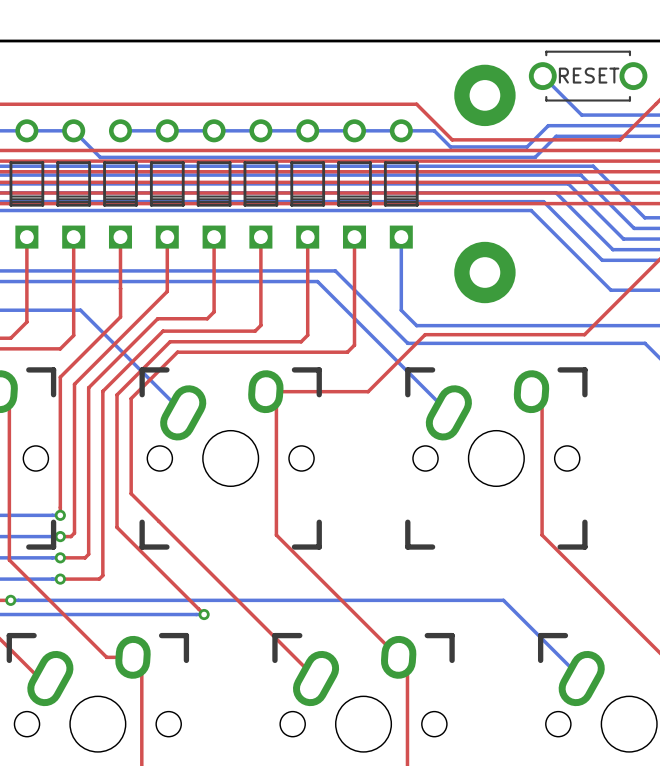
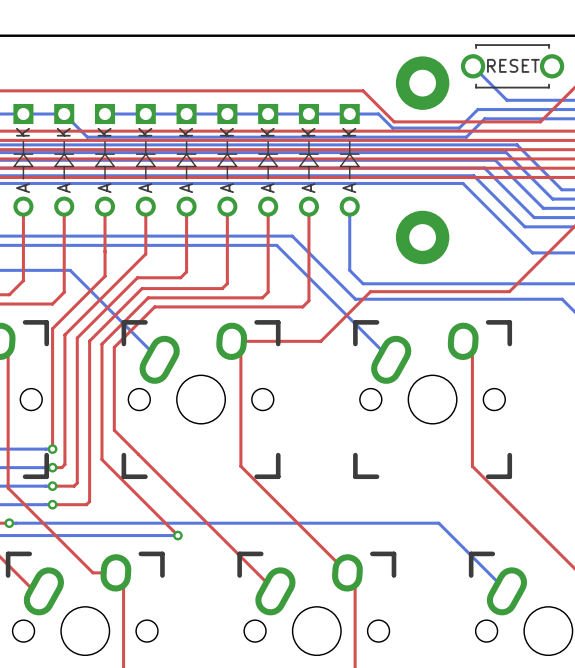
part footprint: [9, 119, 45, 249] -> [13, 103, 34, 217]
part footprint: [56, 119, 92, 249] -> [54, 103, 75, 217]
part footprint: [103, 119, 138, 249] -> [94, 103, 116, 217]
part footprint: [149, 119, 185, 249] -> [135, 103, 156, 217]
part footprint: [196, 119, 232, 249] -> [176, 103, 197, 217]
part footprint: [243, 119, 279, 249] -> [217, 103, 238, 217]
part footprint: [290, 119, 326, 249] -> [258, 103, 279, 217]
part footprint: [337, 119, 372, 249] -> [298, 103, 319, 217]
part footprint: [383, 119, 419, 249] -> [339, 103, 360, 217]

